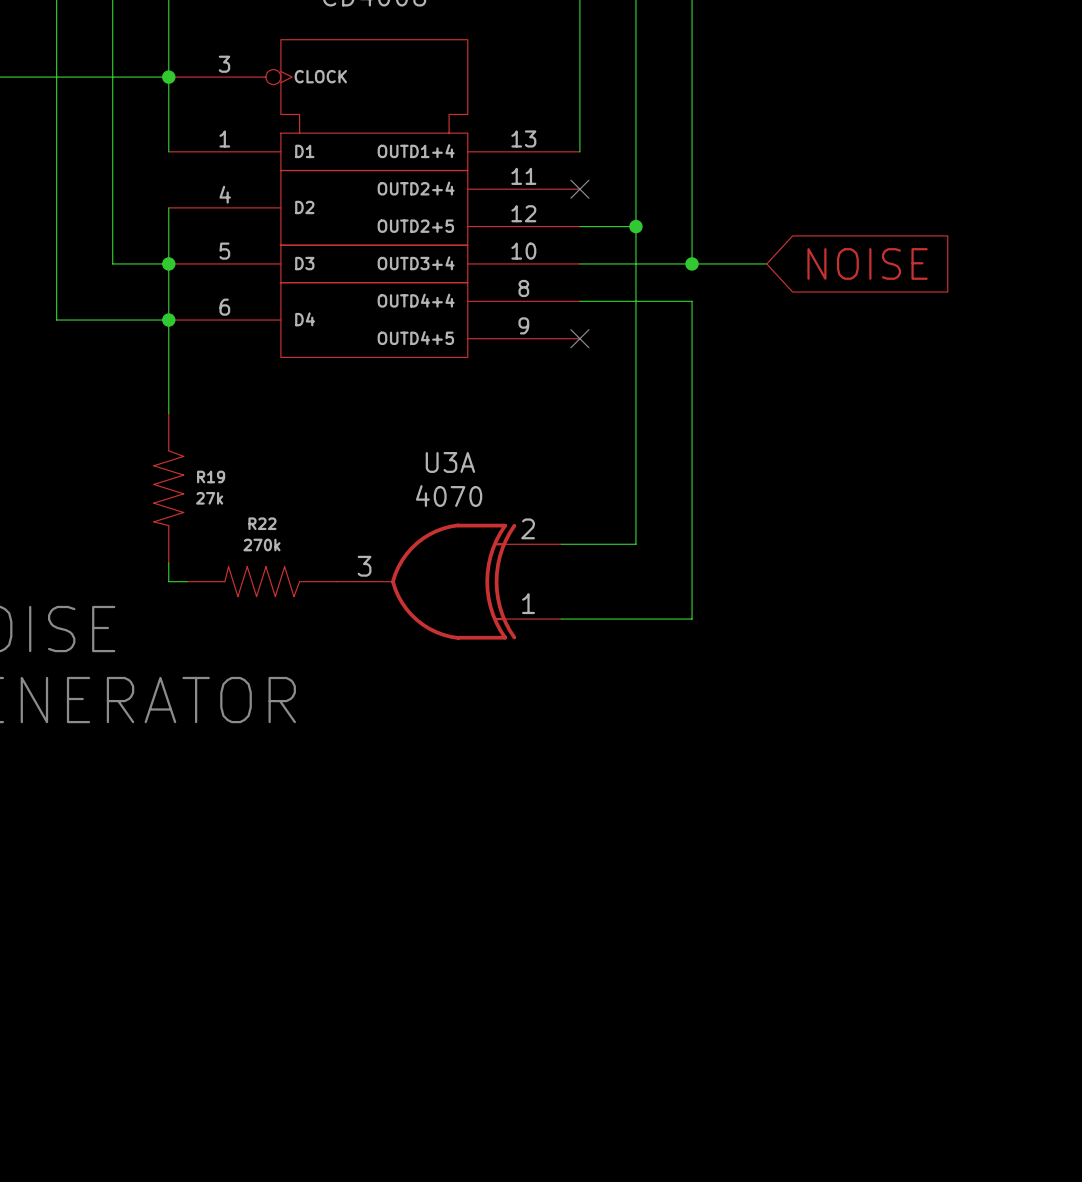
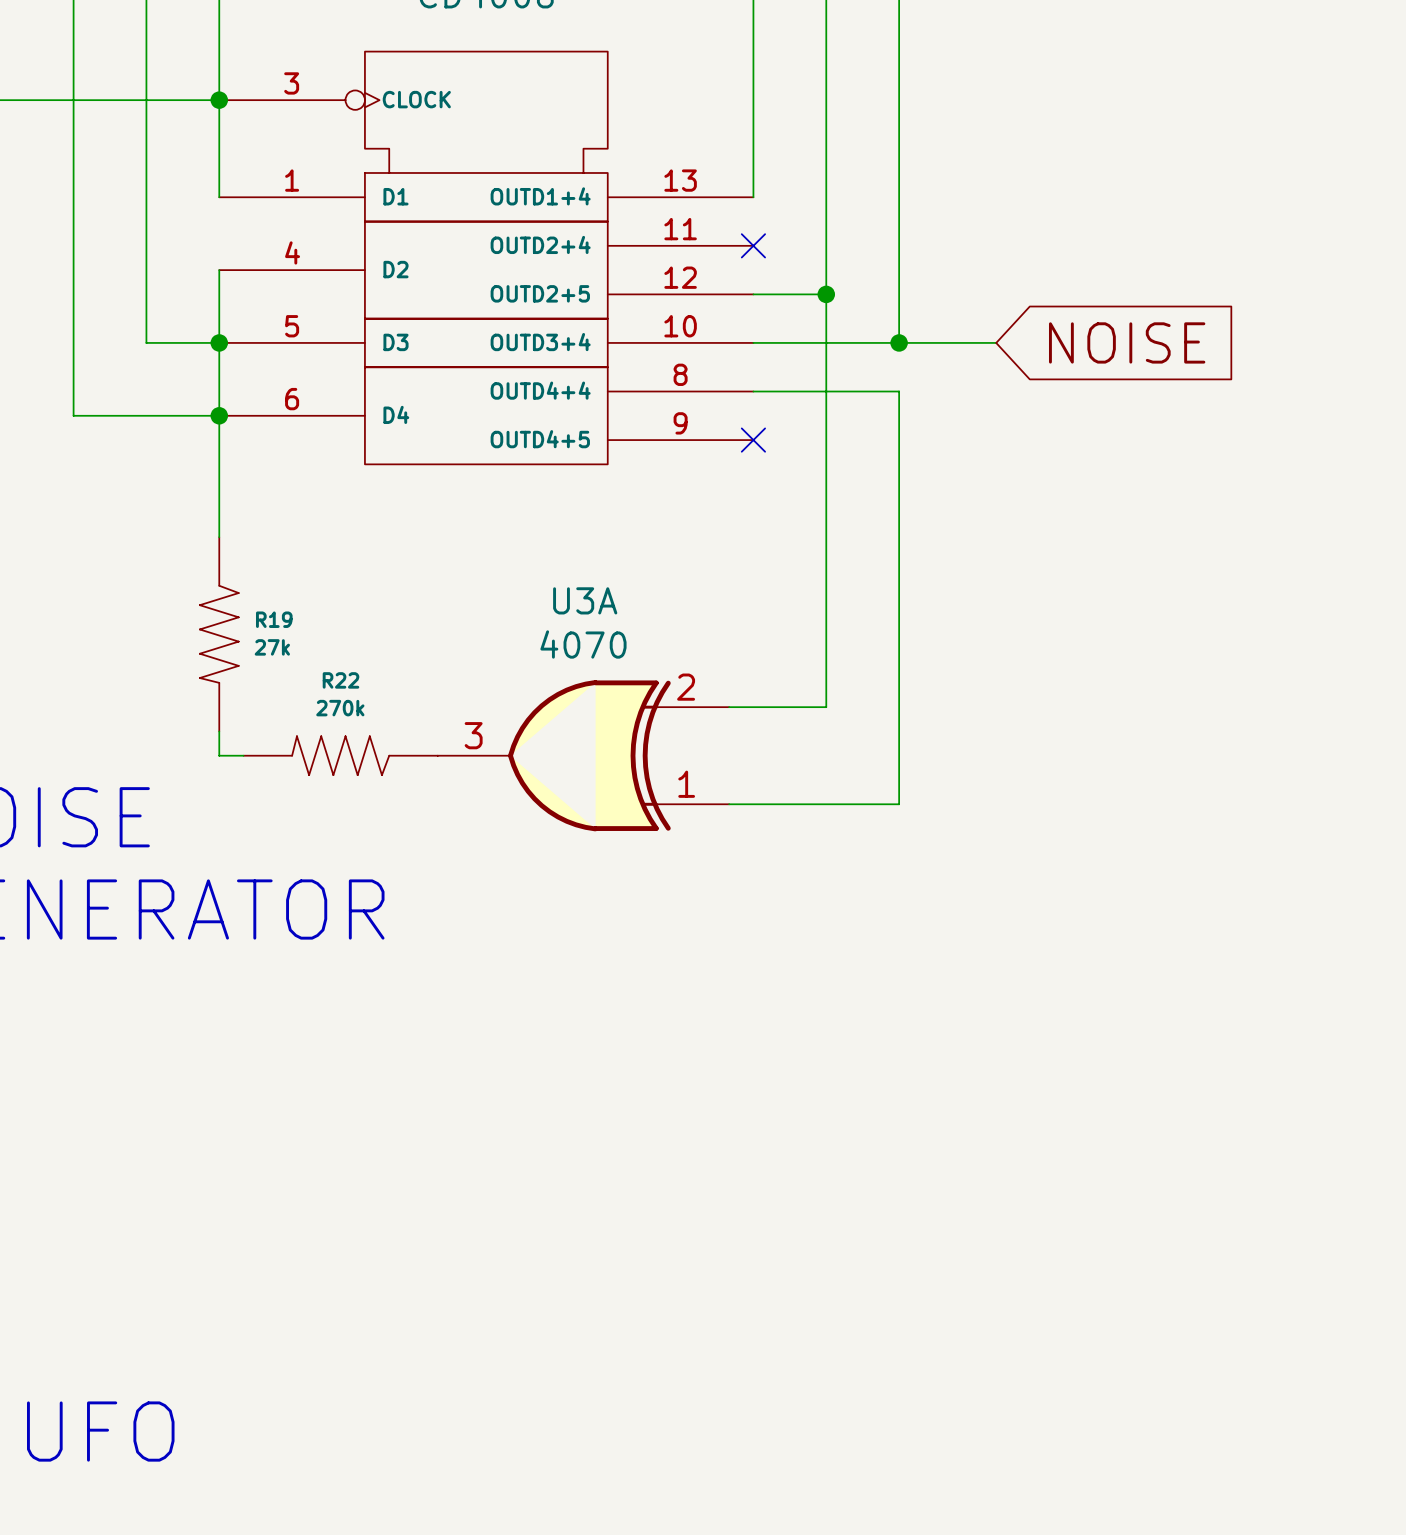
text: none -> UFO (100, 1431)

